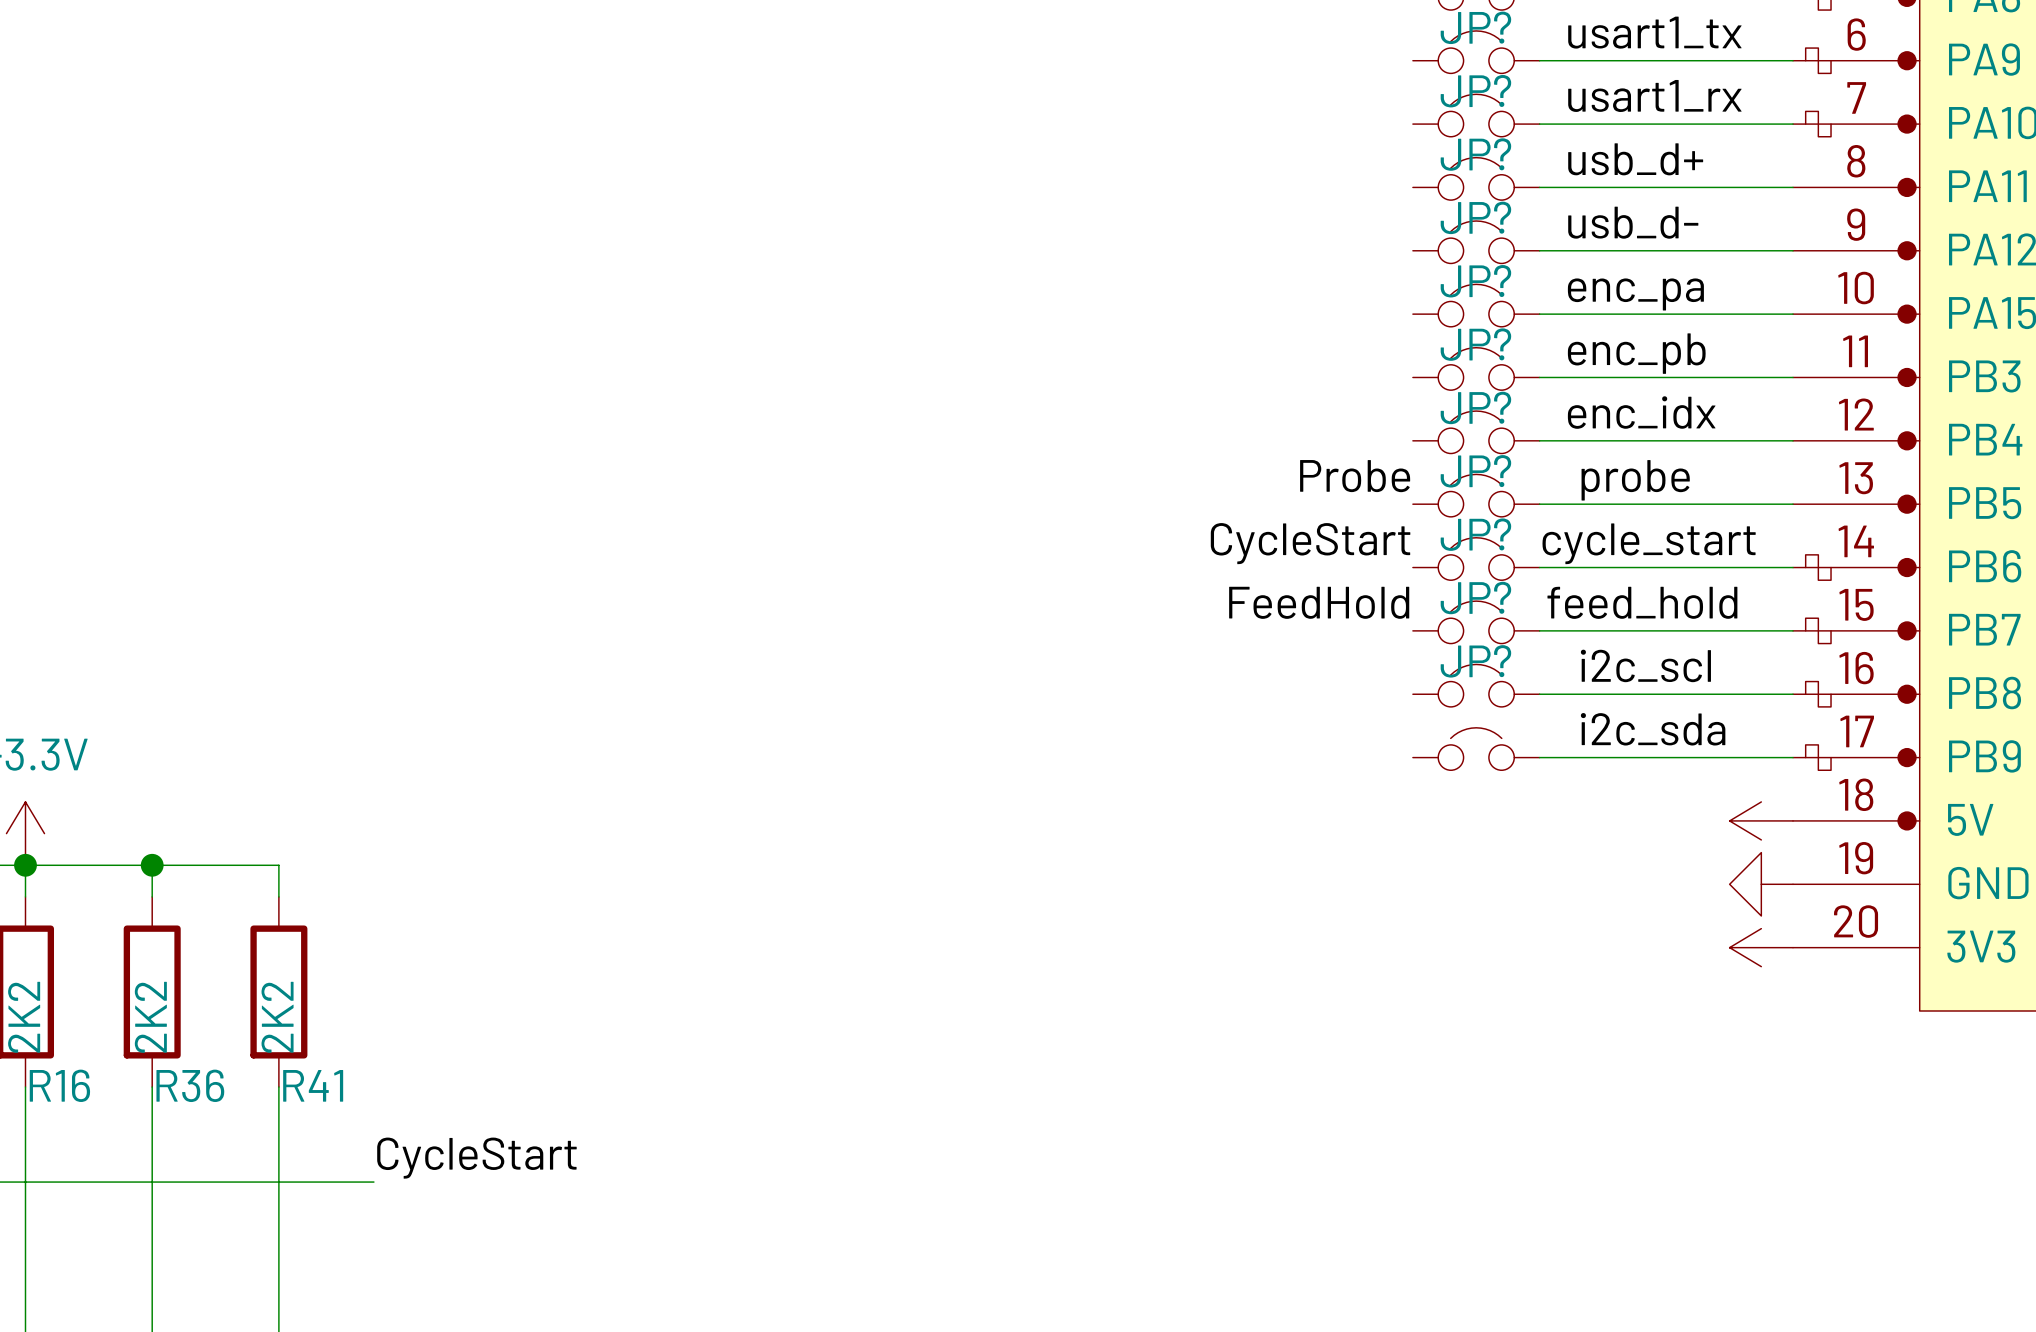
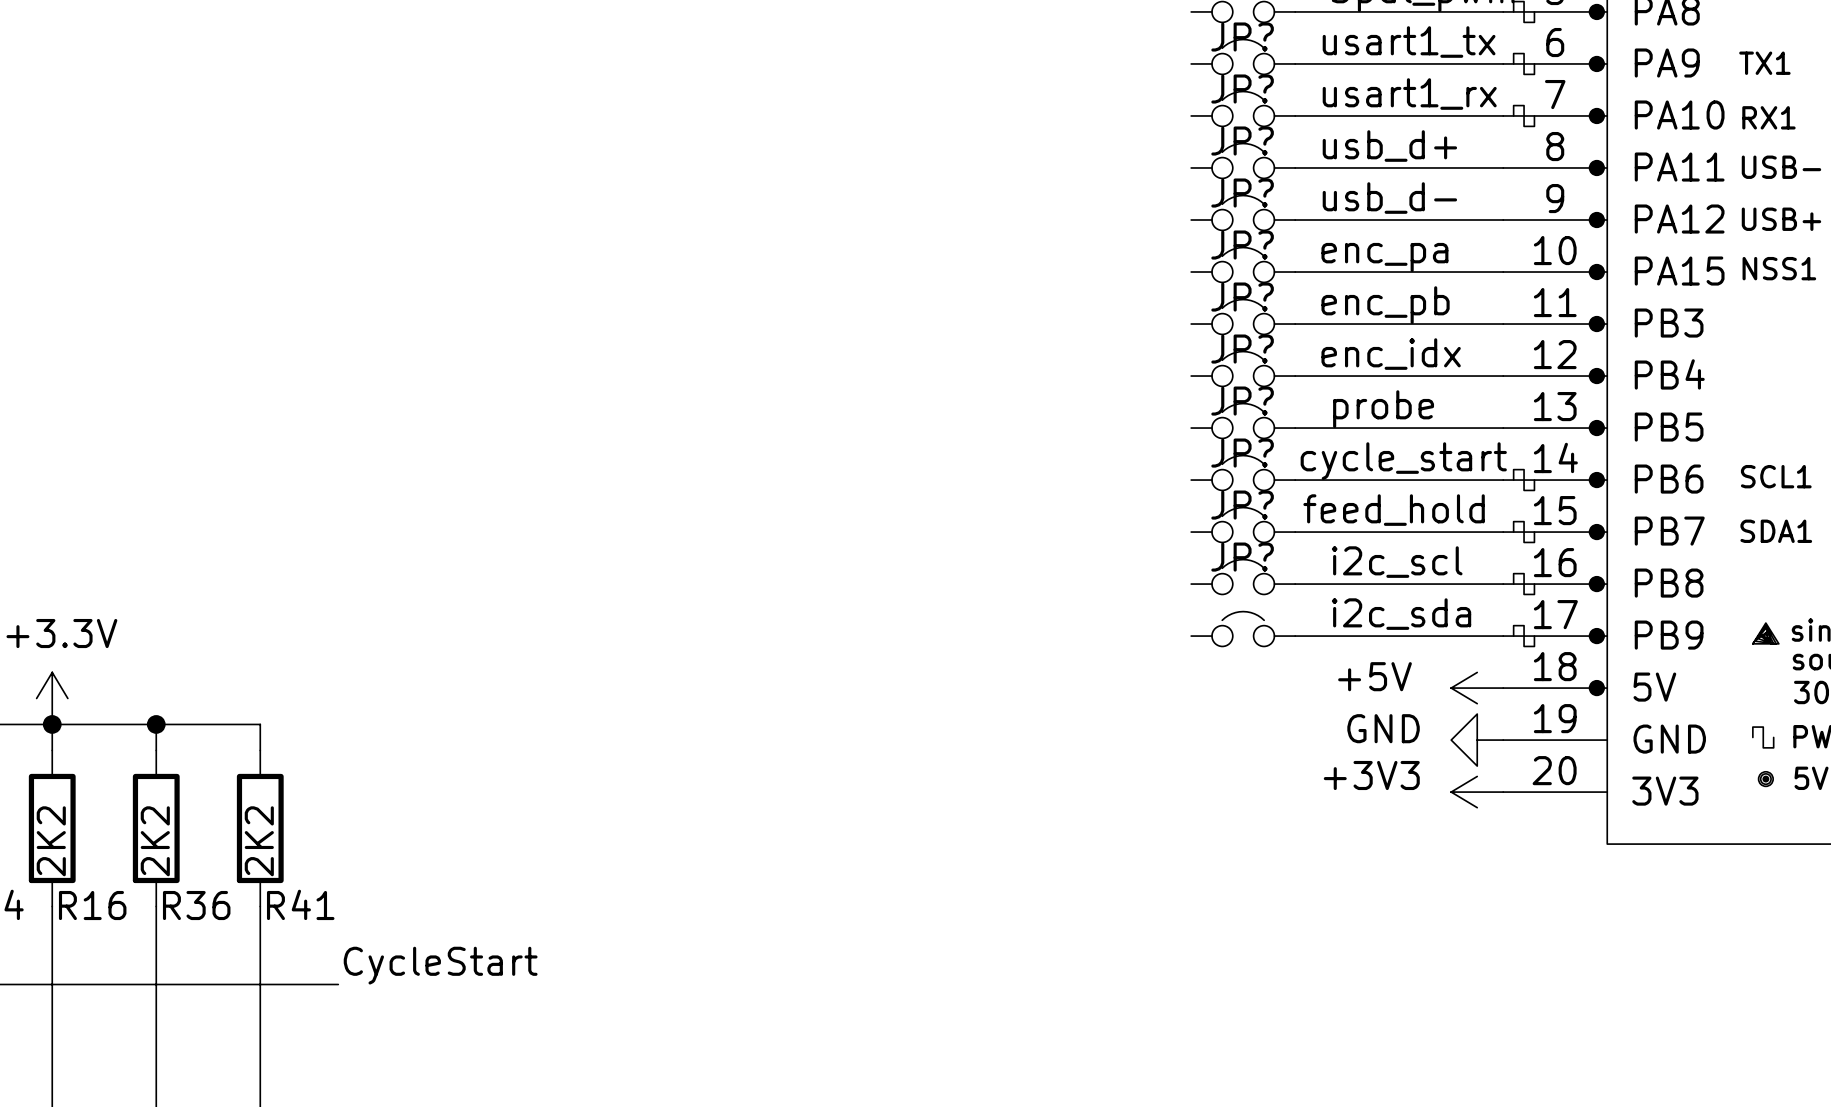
label: Probe (1355, 476) -> none
label: CycleStart (1310, 543) -> none
label: FeedHold (1319, 602) -> none
power symbol text: none -> +5V (1375, 676)
power symbol text: none -> GND (1383, 728)
power symbol text: none -> +3V3 (1371, 775)

